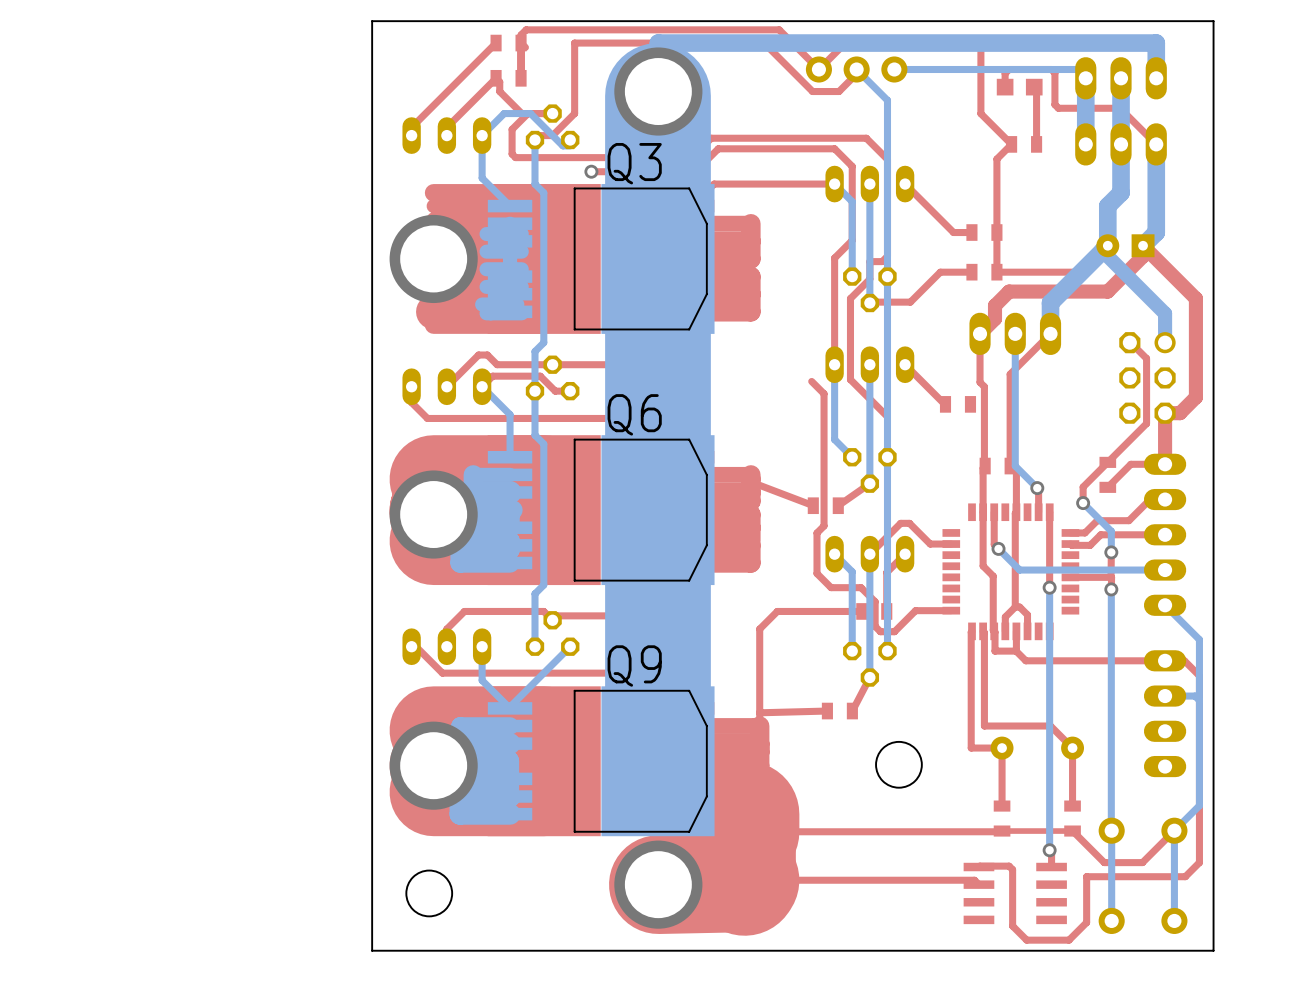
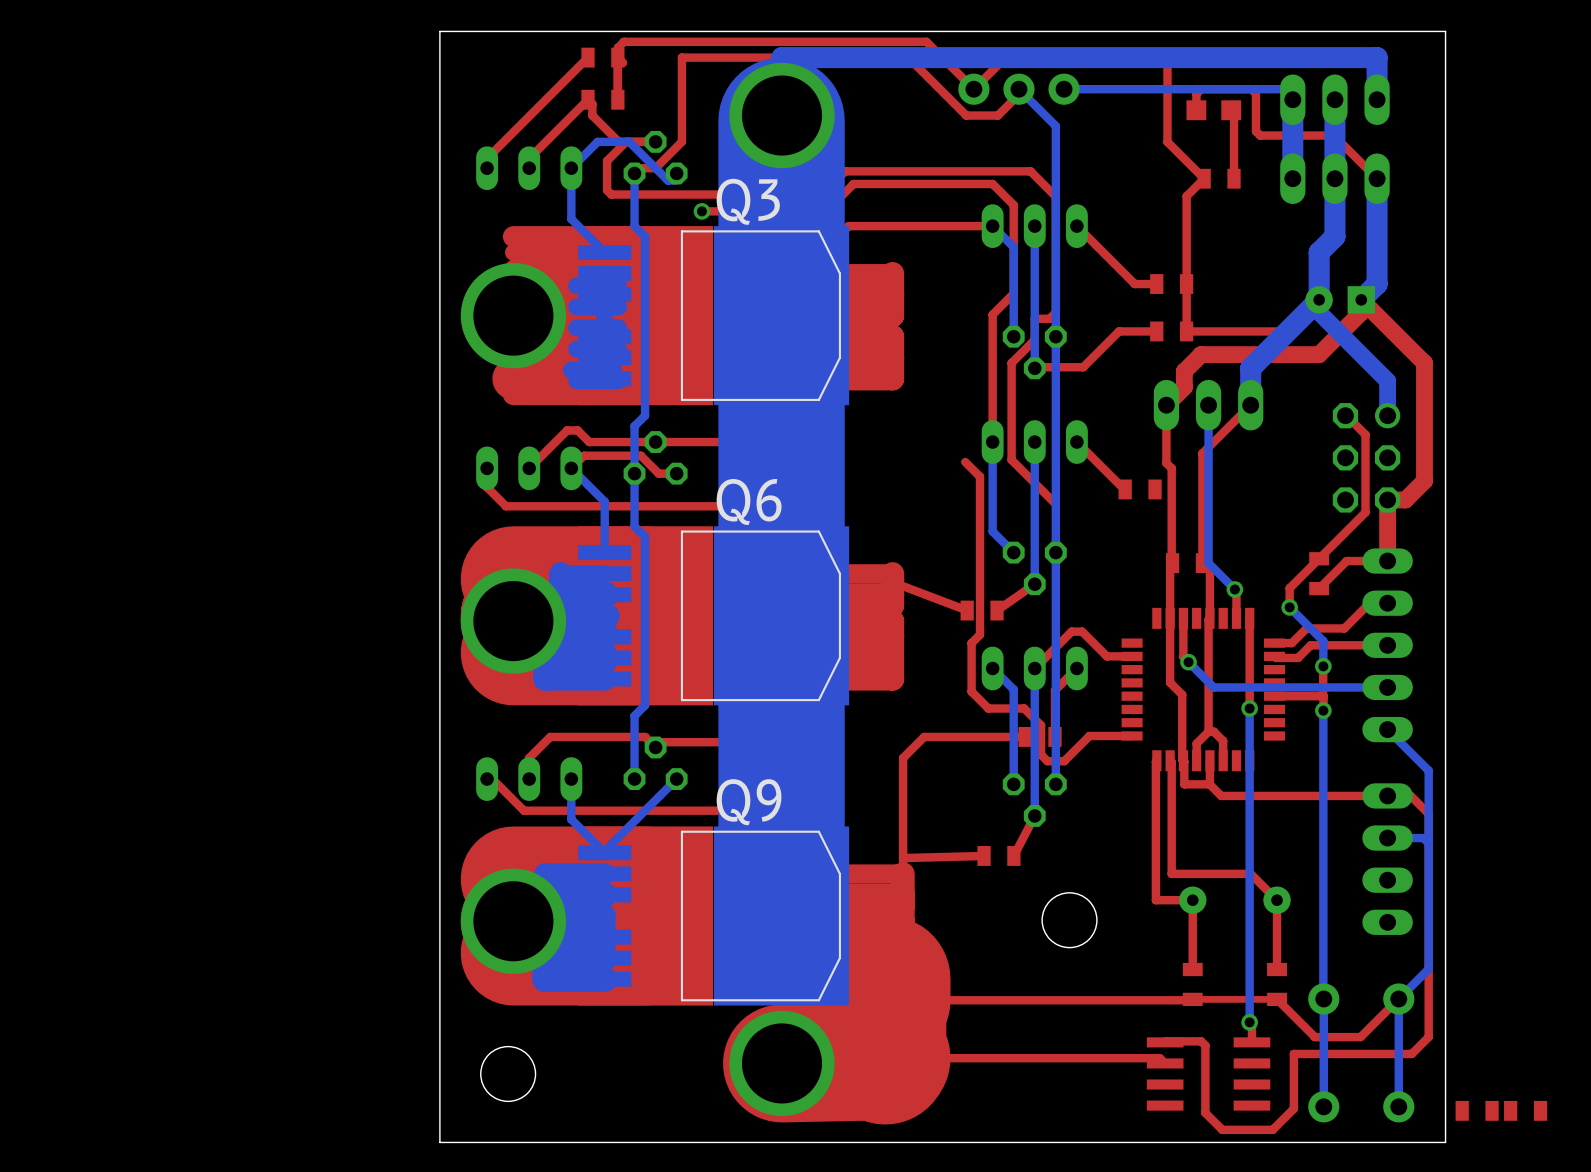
part: none -> (1477, 1110)
part: none -> (1525, 1110)

